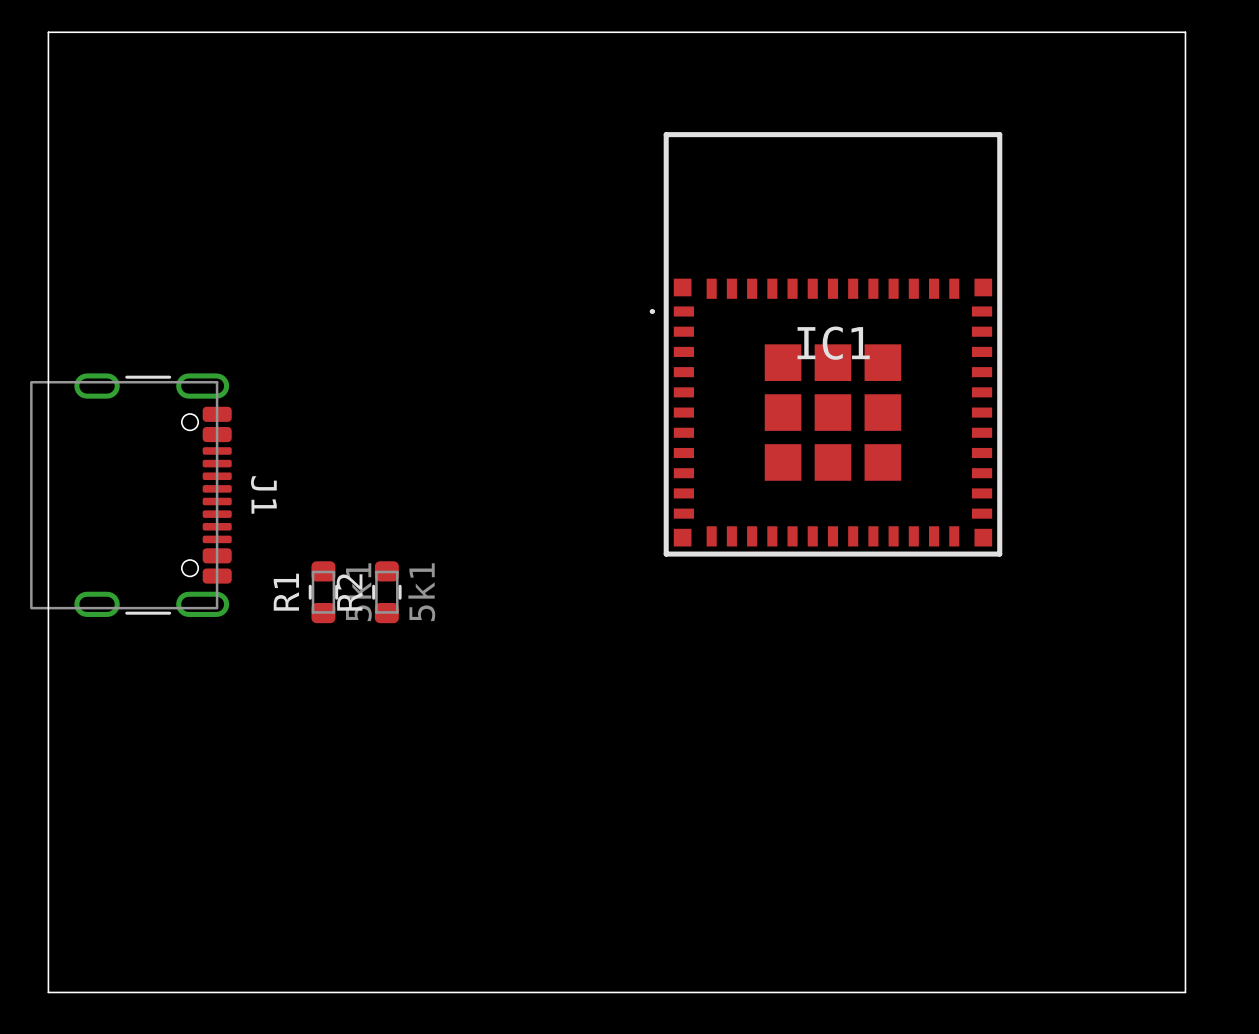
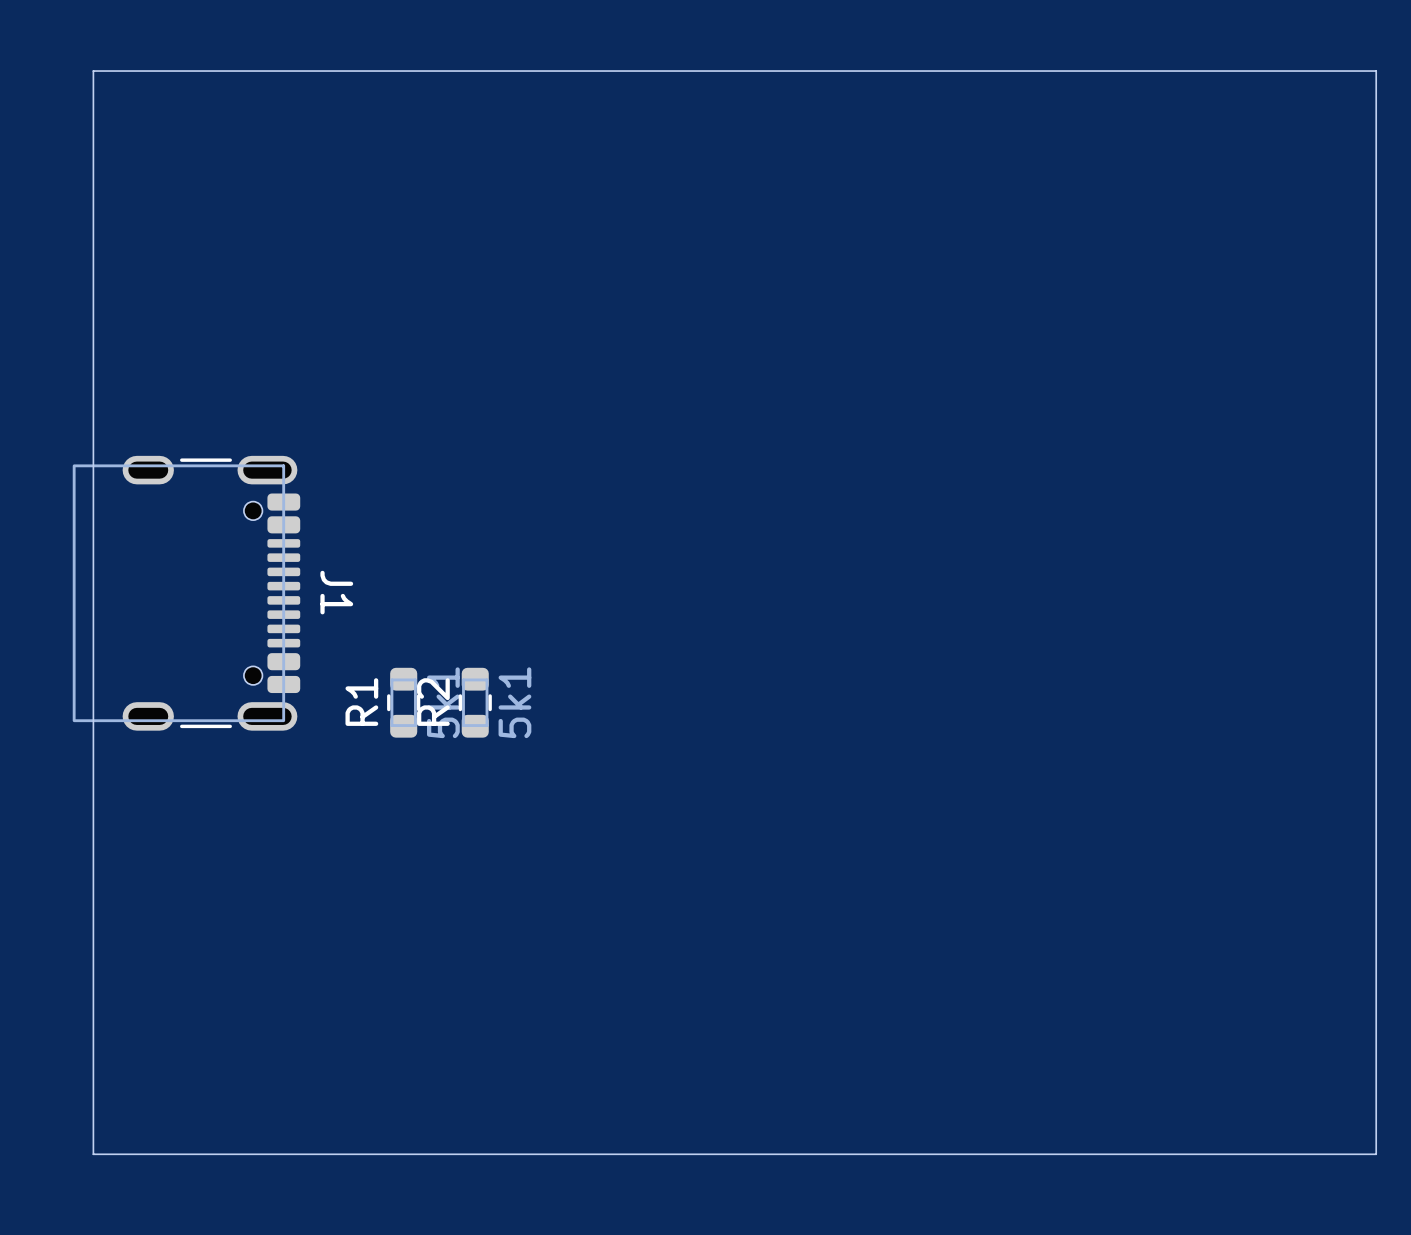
IC1: (826, 344) -> none

